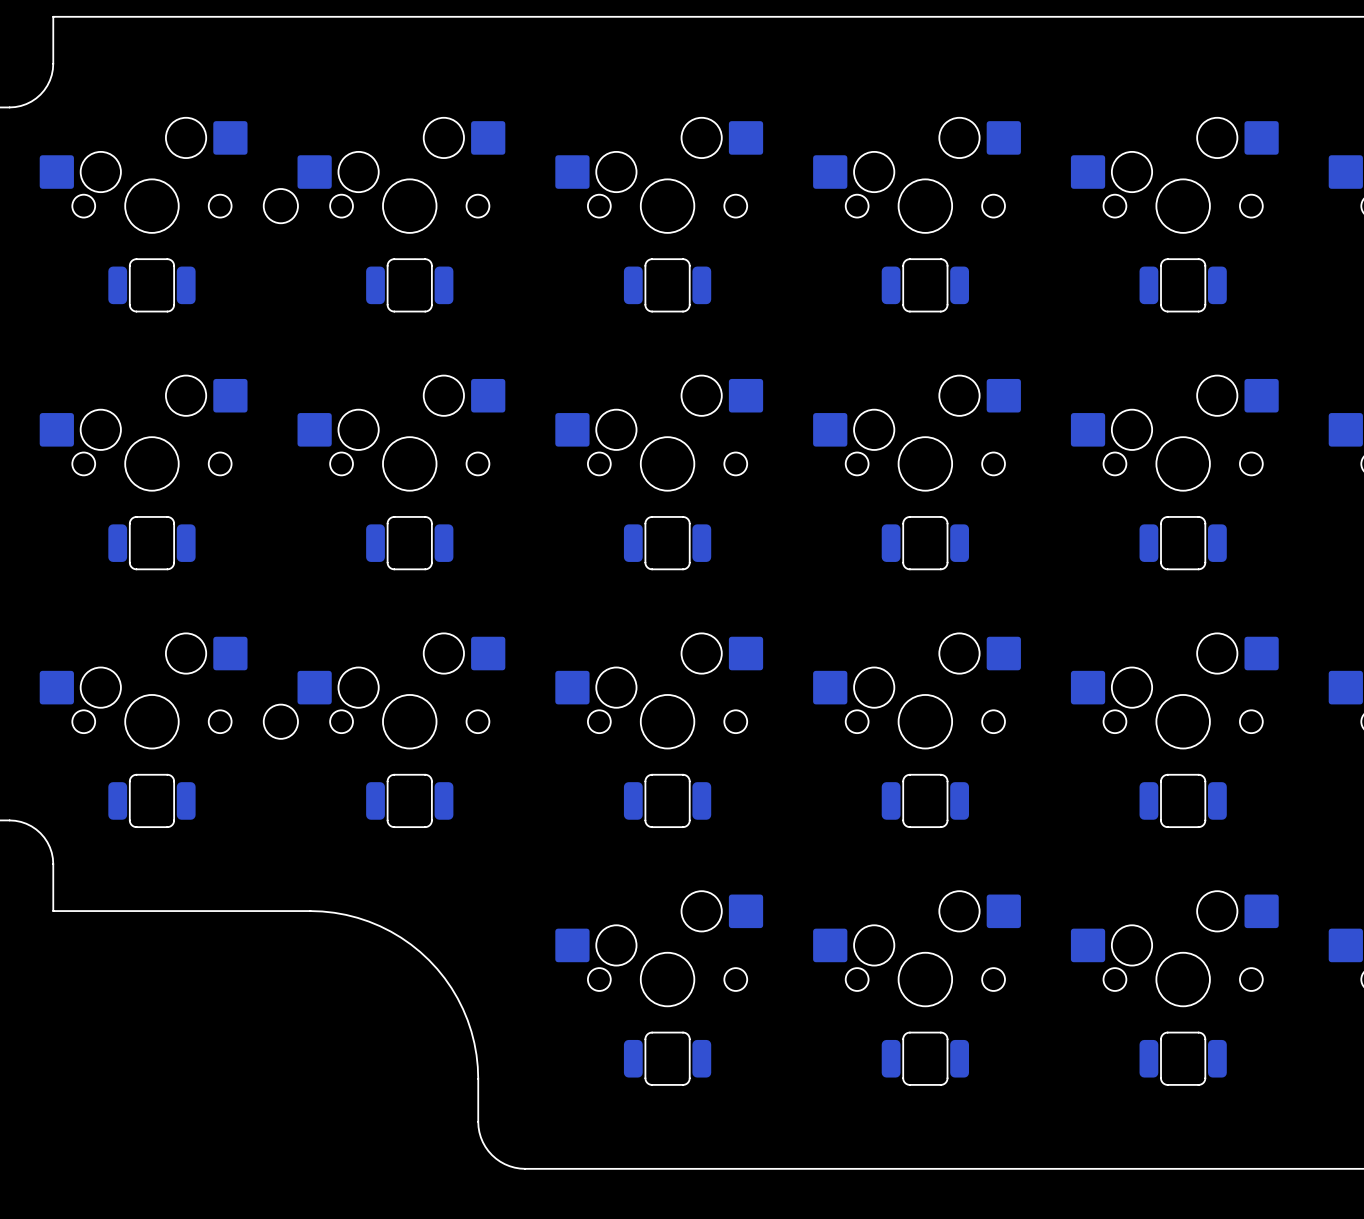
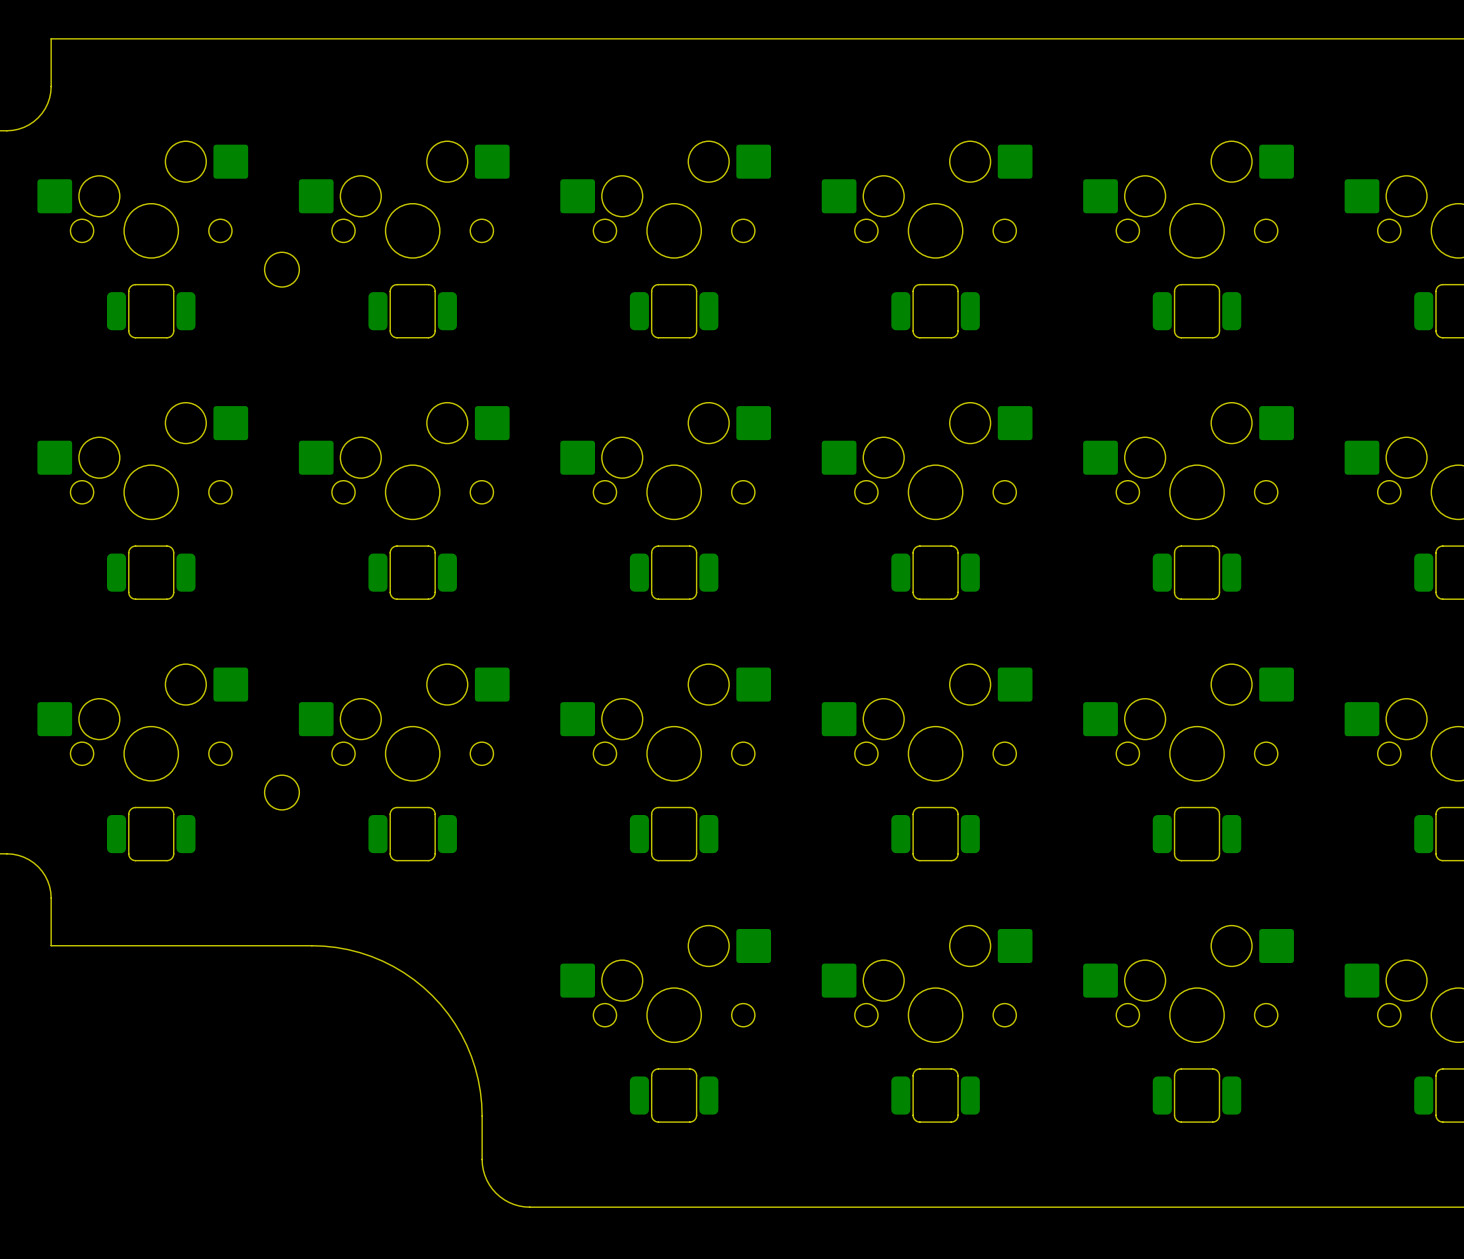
round board edge position: (280, 206) -> (281, 269)
round board edge position: (280, 721) -> (281, 792)

